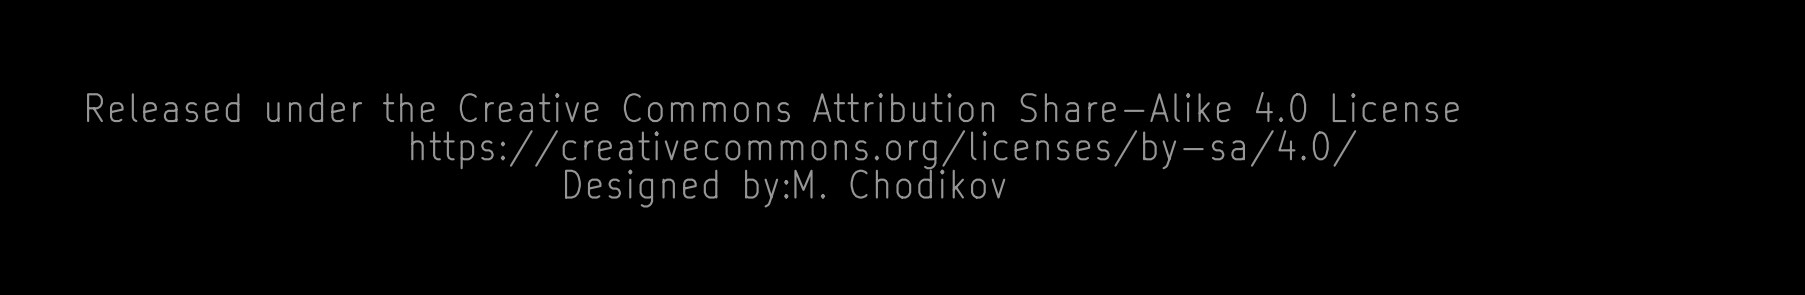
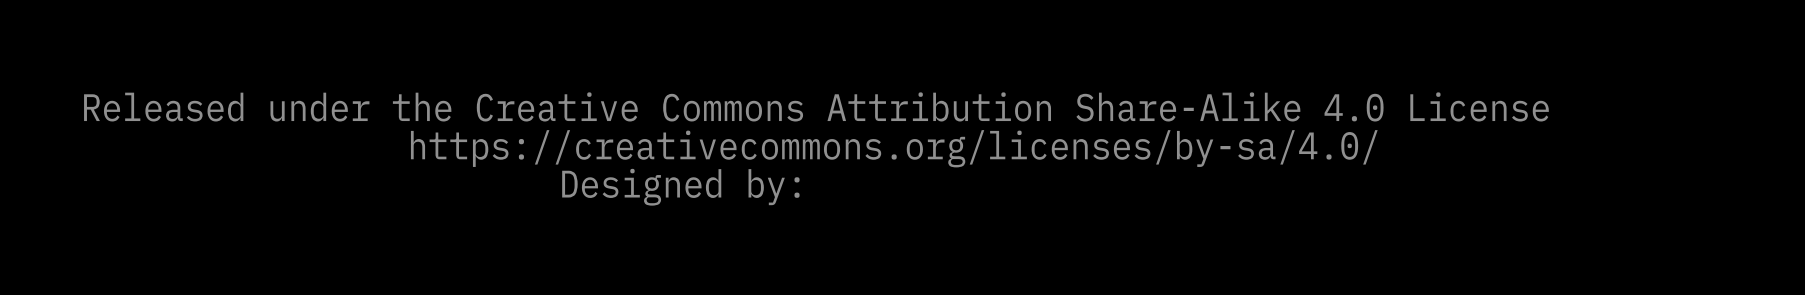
text: M. Chodikov (899, 184) -> none

